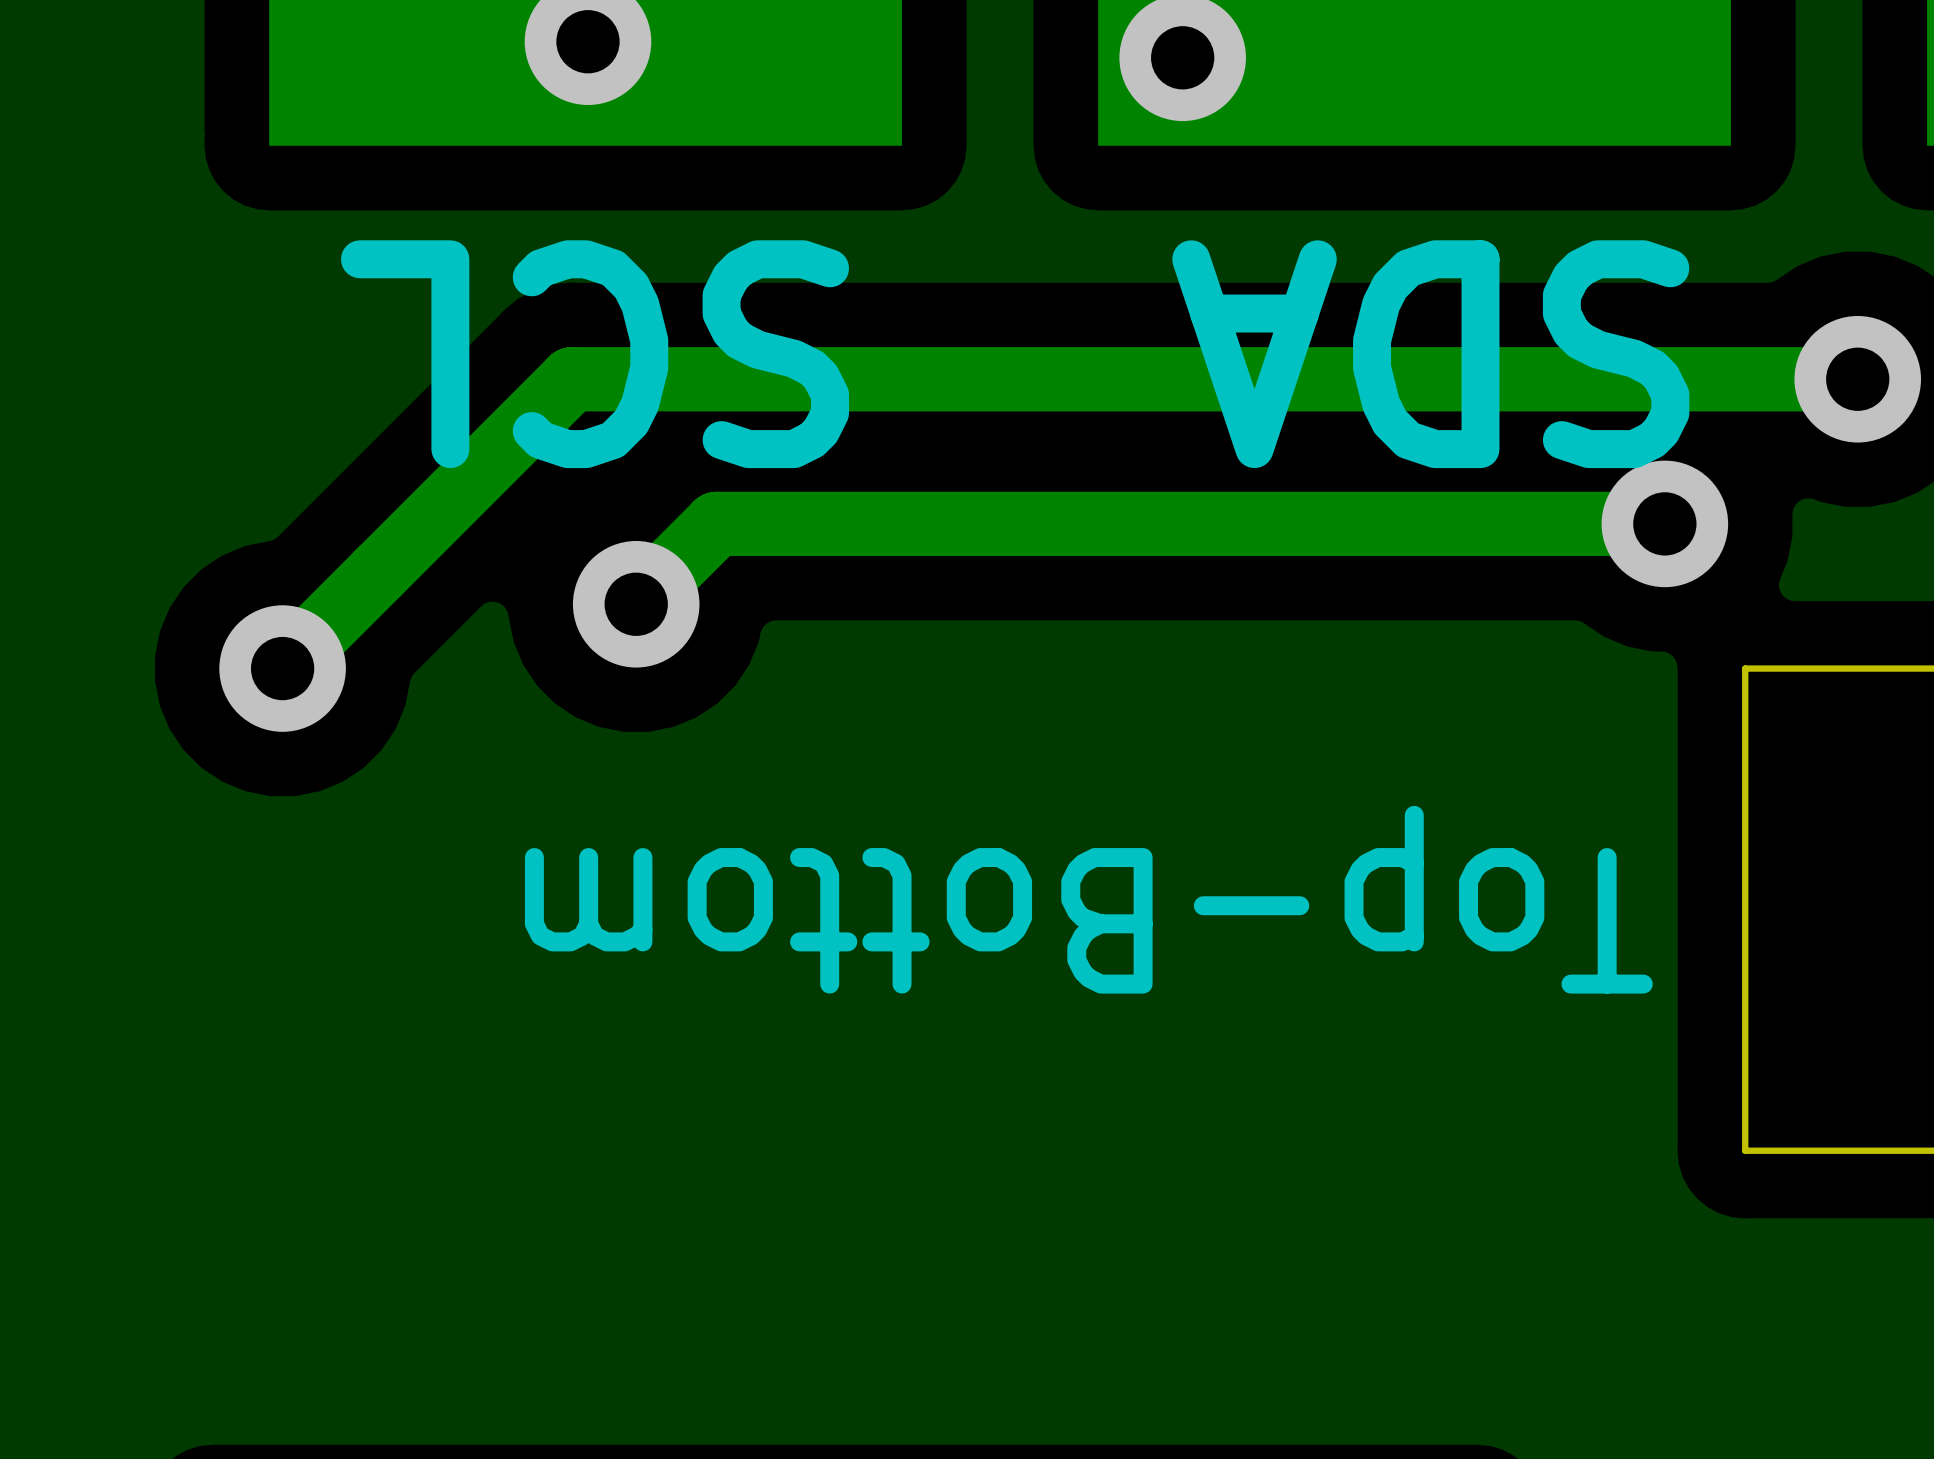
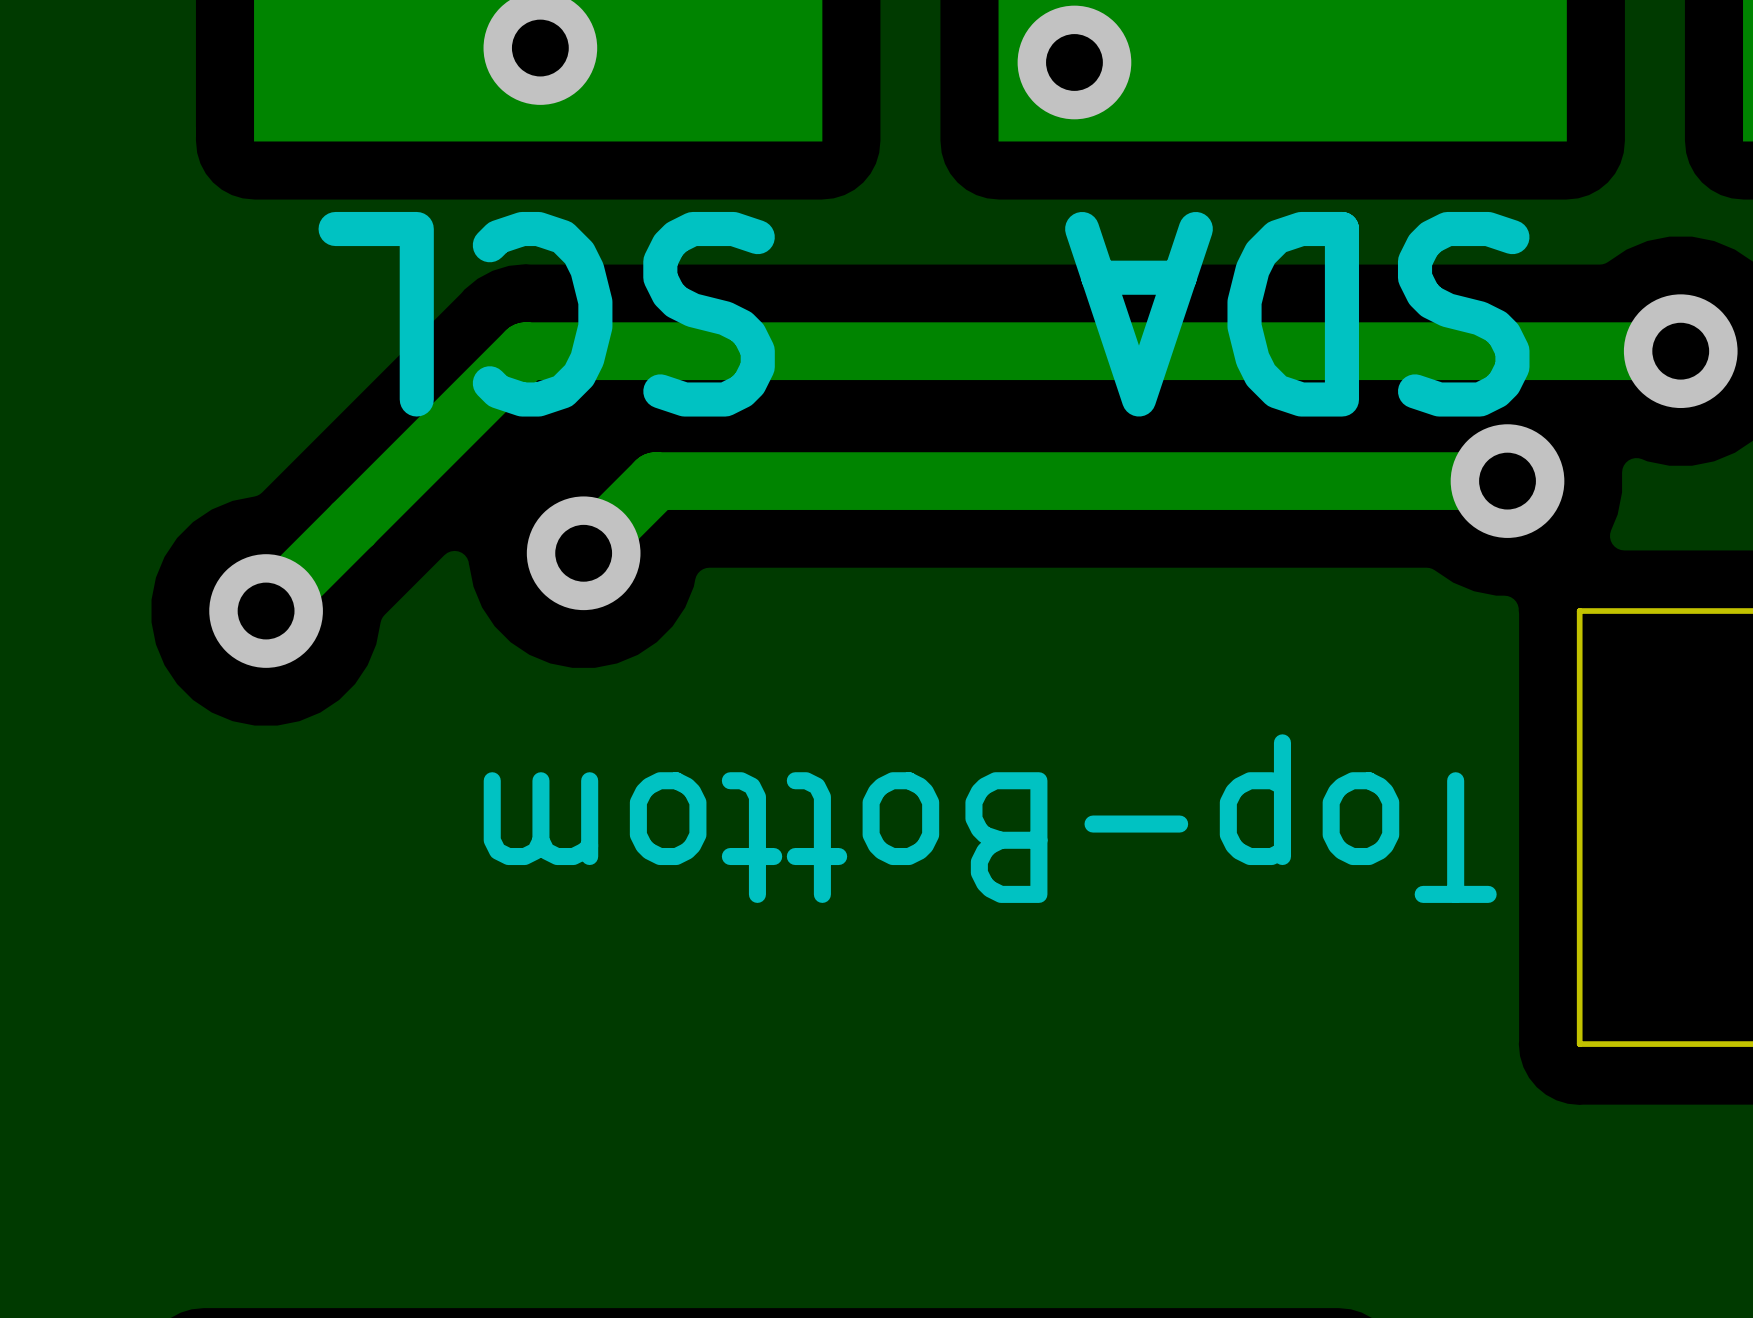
text position: SCL (595, 354) -> SCL (546, 314)
text position: SDA (1430, 354) -> SDA (1297, 314)

